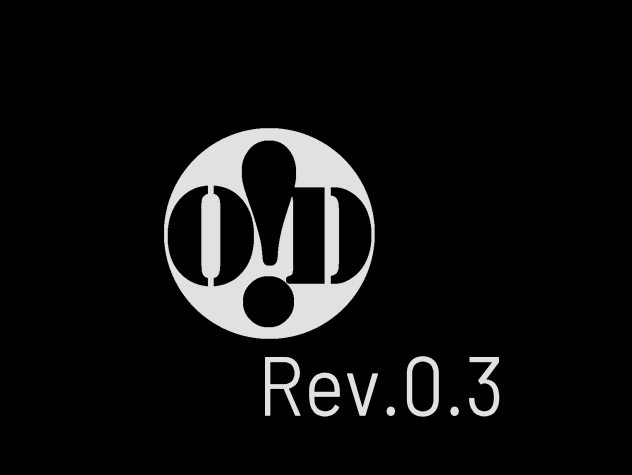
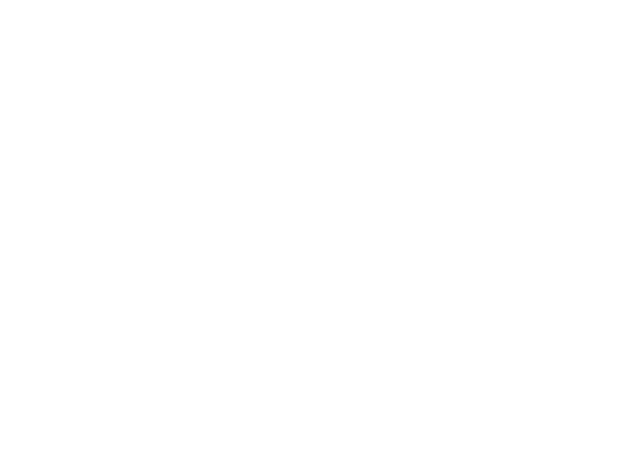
drawing: [164, 128, 375, 339] -> none
text: Rev.0.3 (382, 386) -> none

